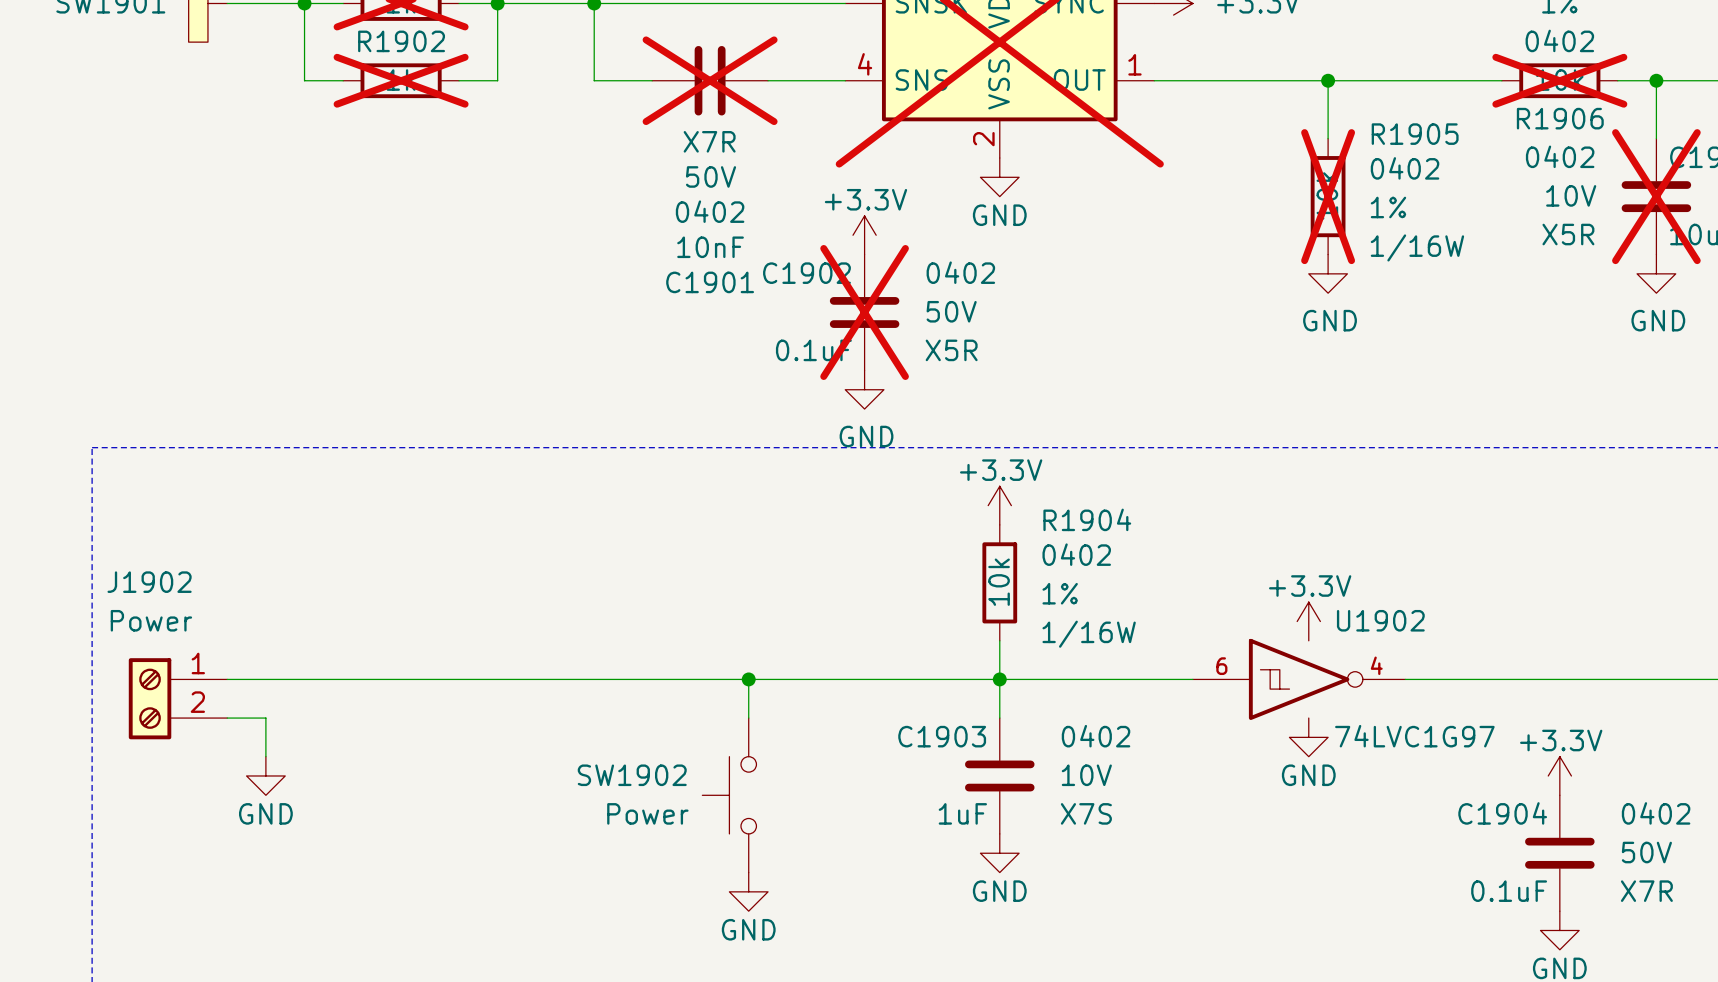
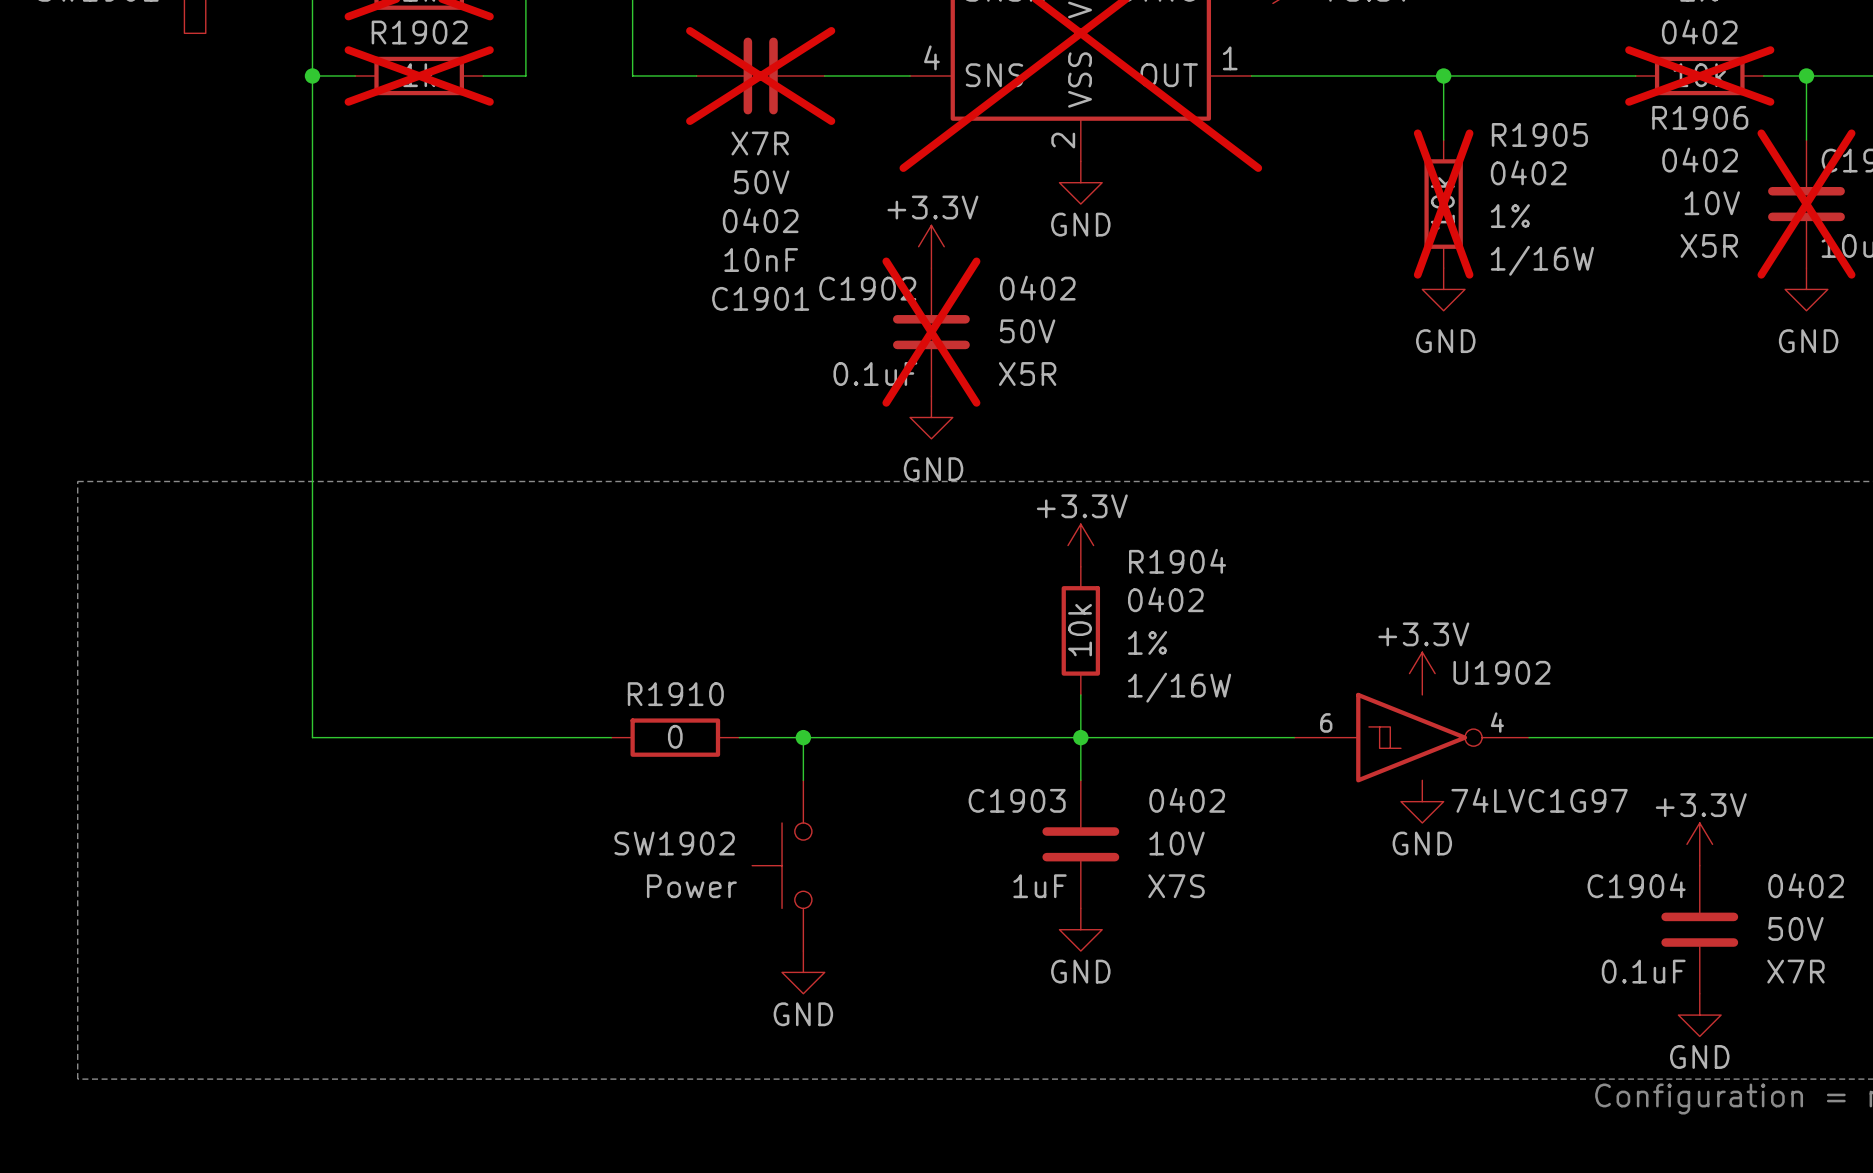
junction: none -> (312, 75)
wire: (227, 679) (304, 679) -> (312, 75) (312, 737)
wire: (574, 679) (690, 679) -> none
R1910: none -> 0 (675, 737)
J1902: Power (178, 698) -> none
wire: (227, 718) (265, 718) (265, 756) -> none
power symbol: GND (265, 775) -> none

